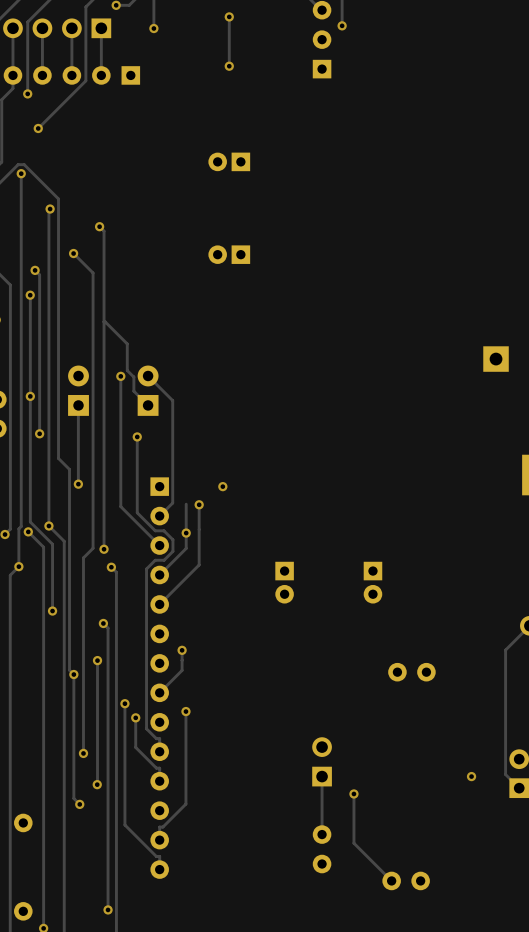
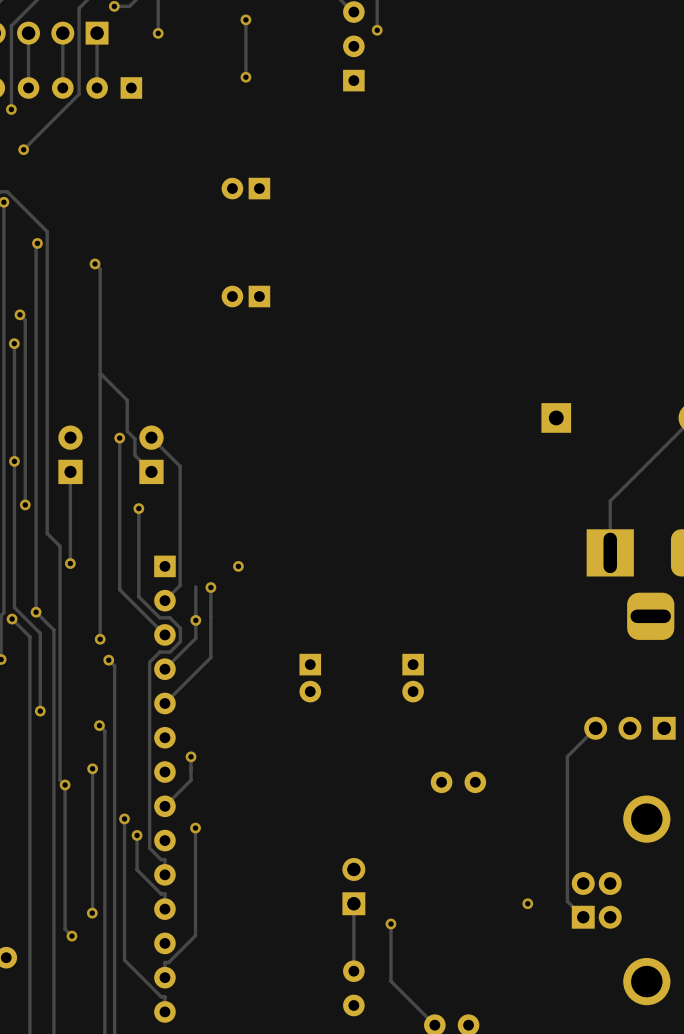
track: (73, 253) (93, 272) (93, 548) (83, 557) (83, 753) -> none
via: (73, 253) -> none
via: (83, 753) -> none

